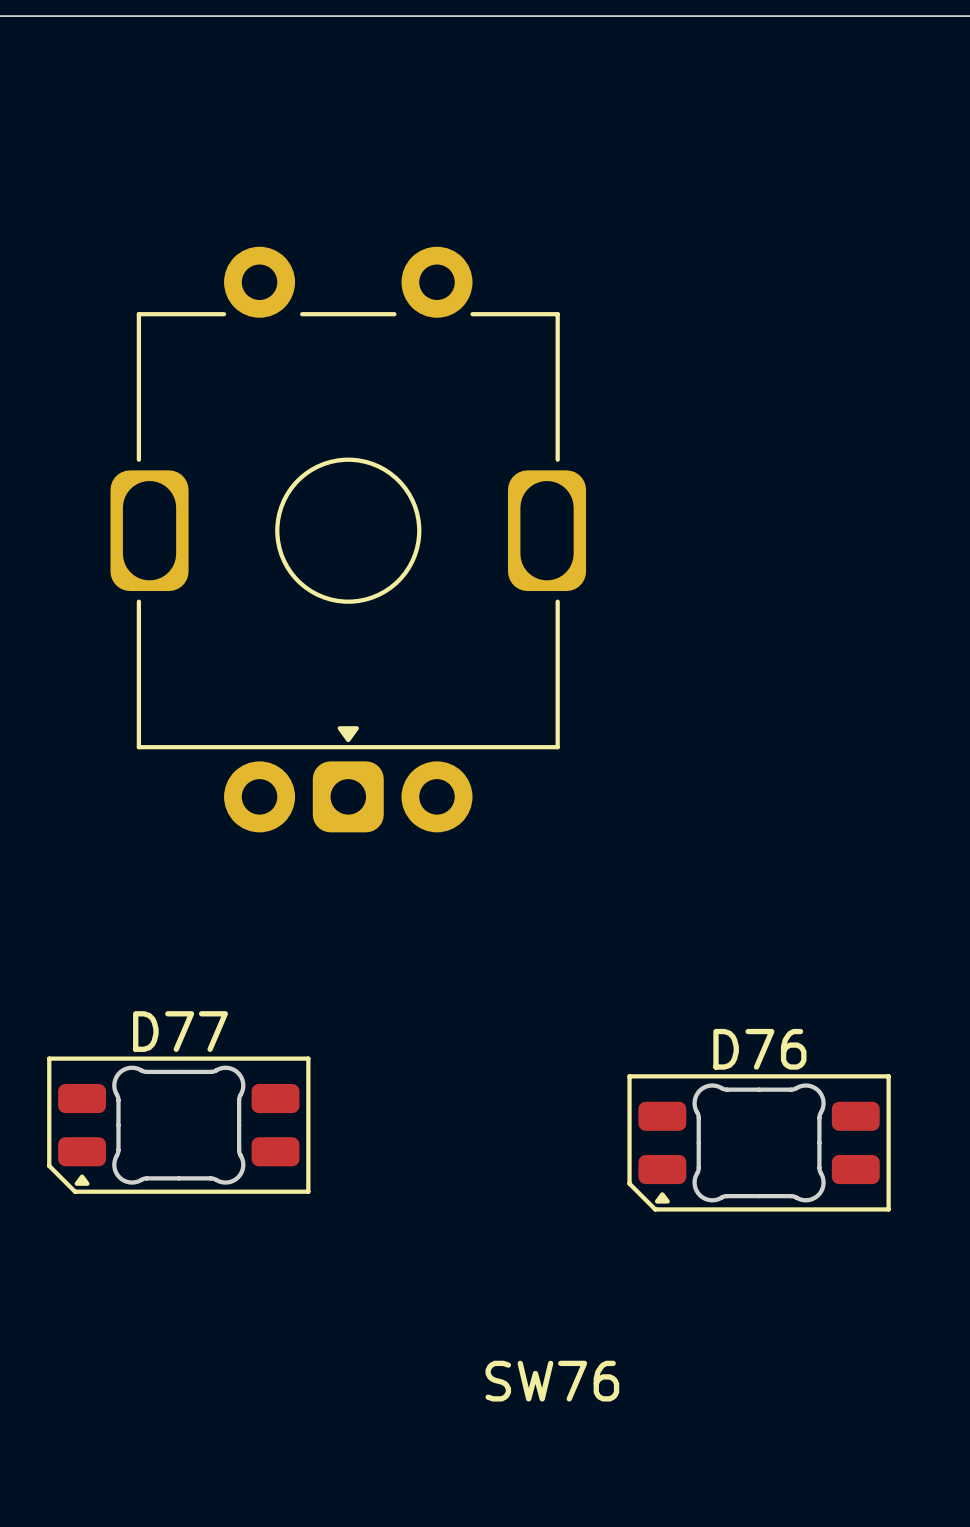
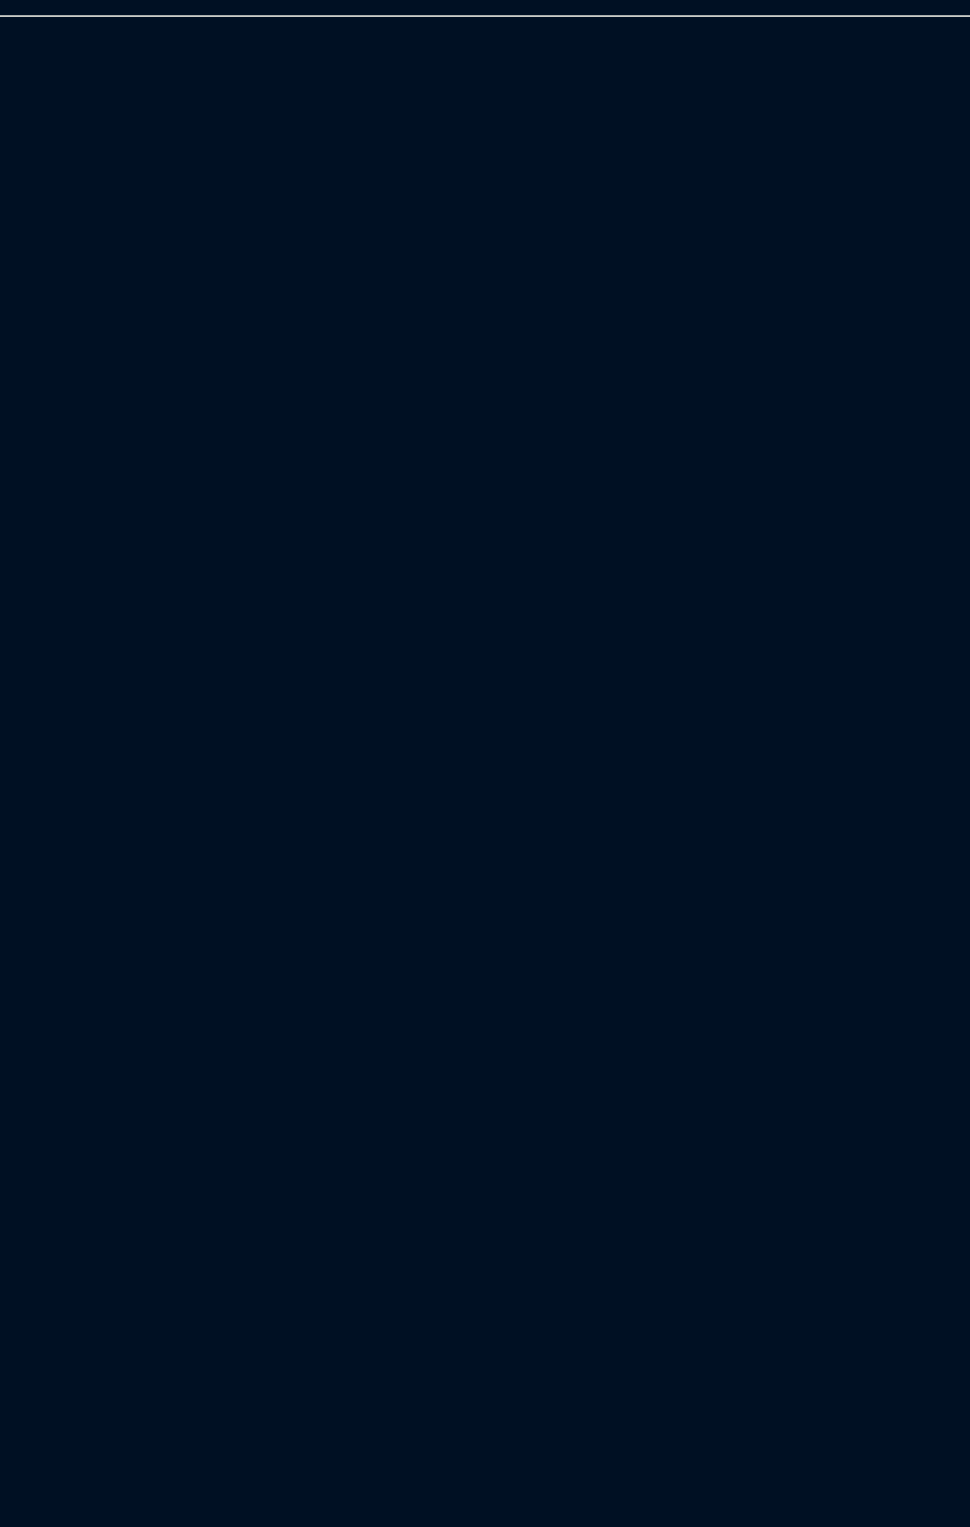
SW76: (348, 539) -> none
D77: (178, 1125) -> none
D76: (759, 1142) -> none

